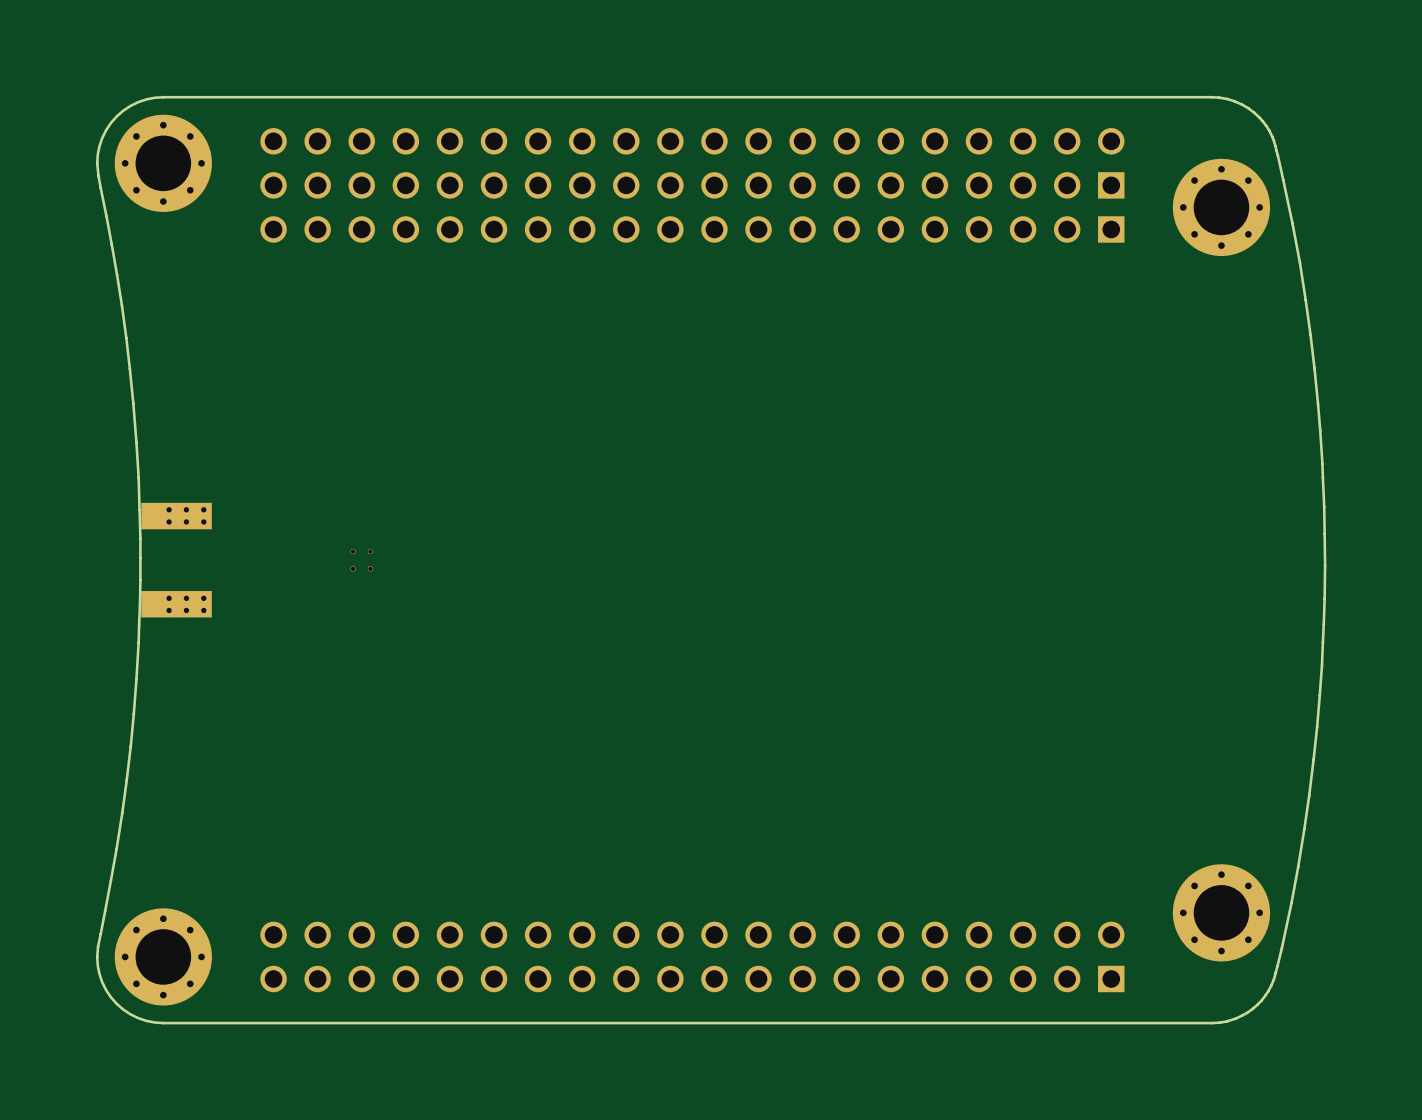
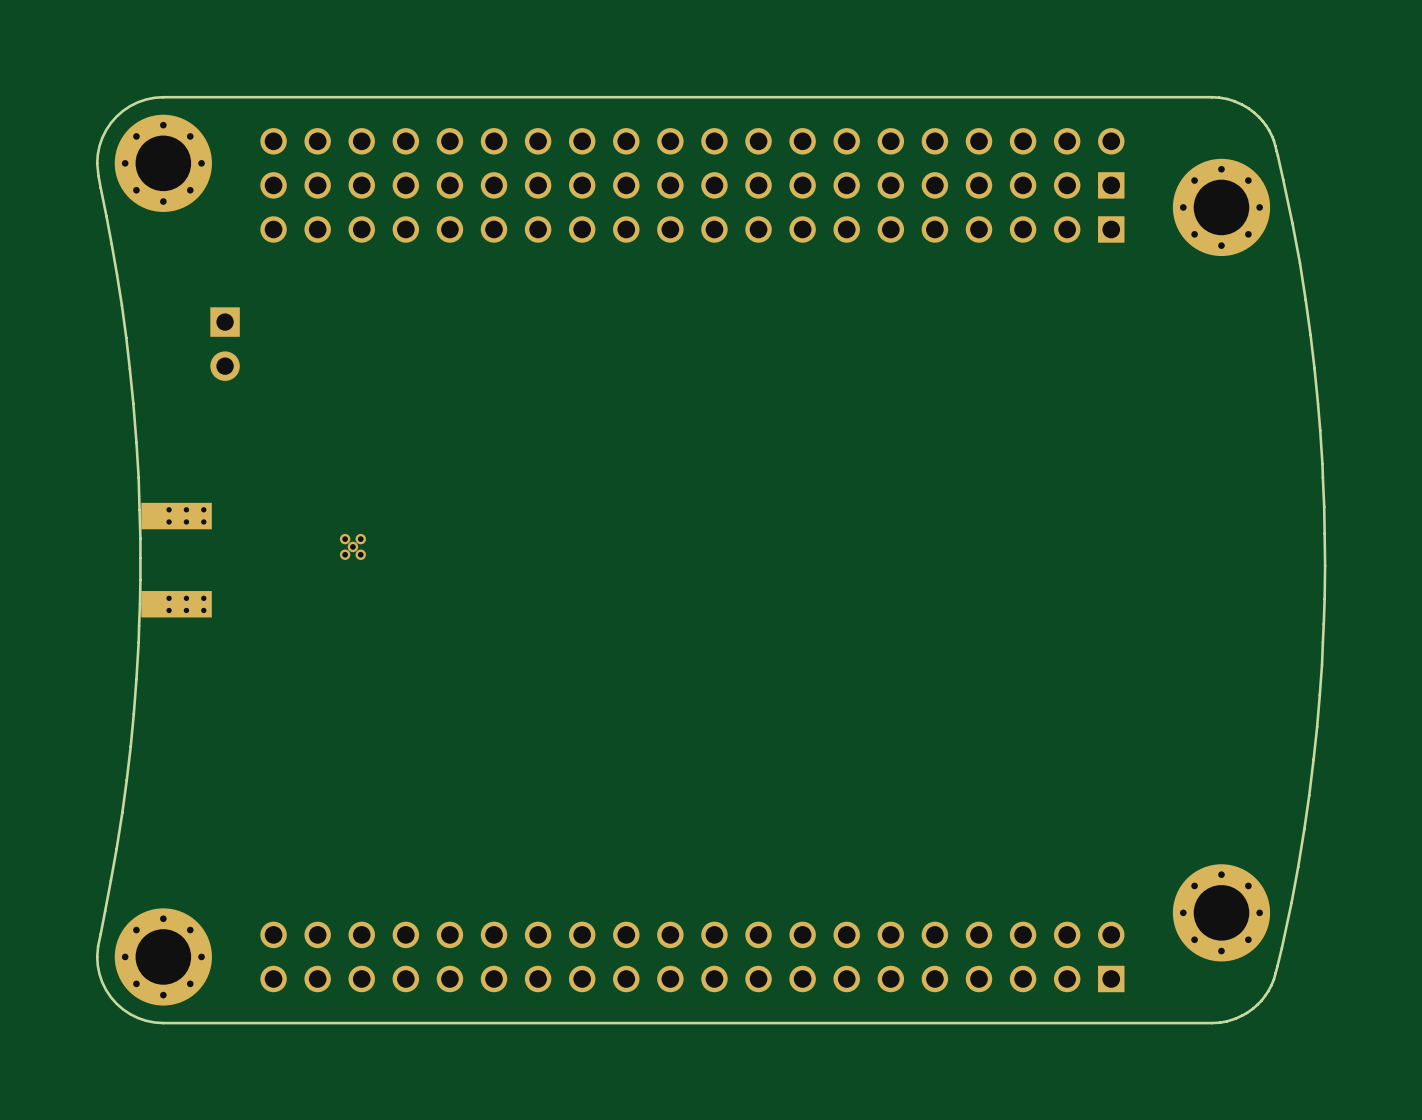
part: none -> (225, 344)
part footprint: [350, 548, 374, 572] -> [339, 533, 366, 560]

